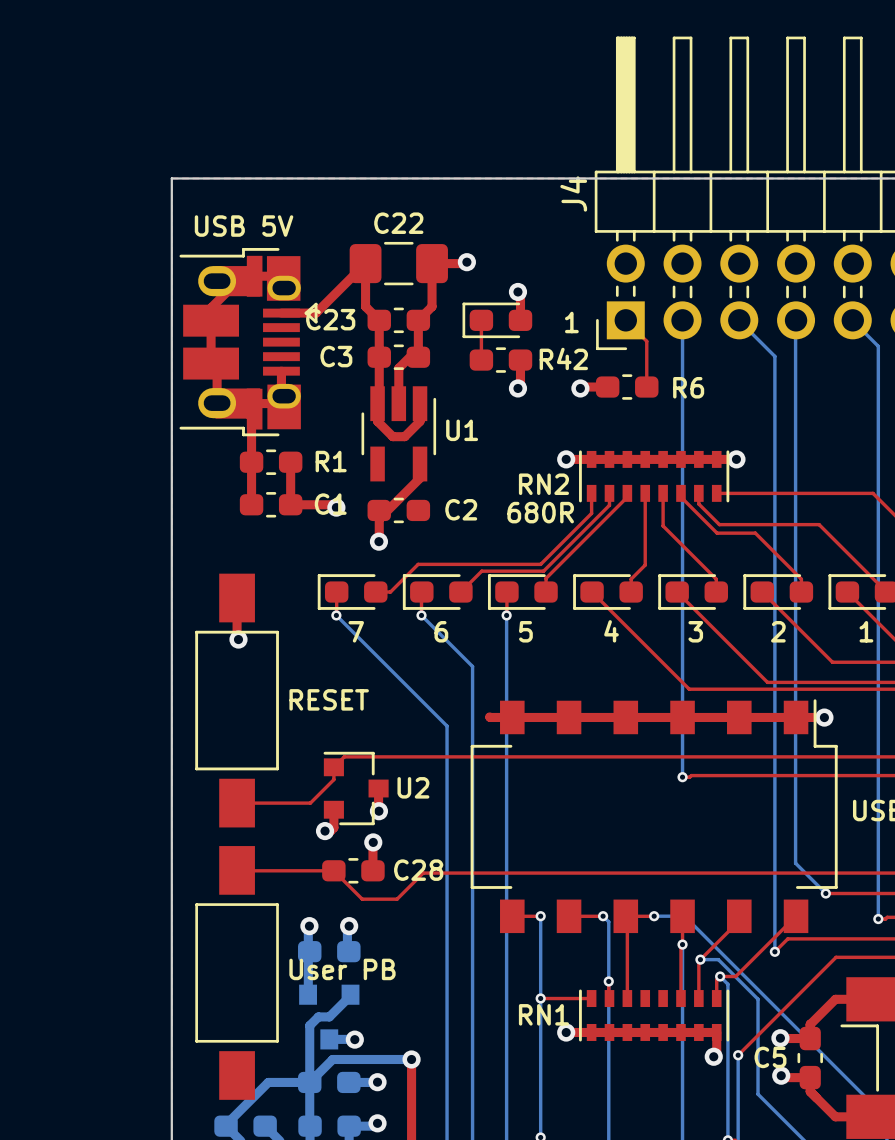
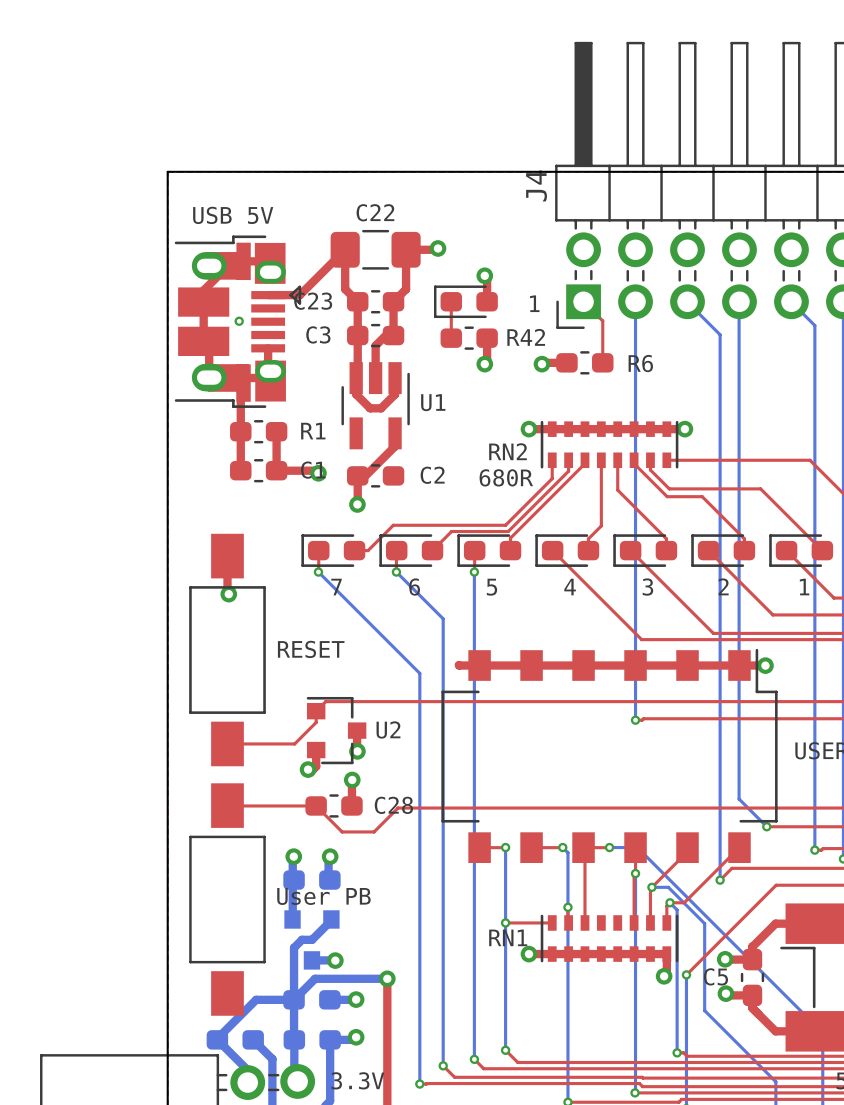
via: none -> (239, 321)

